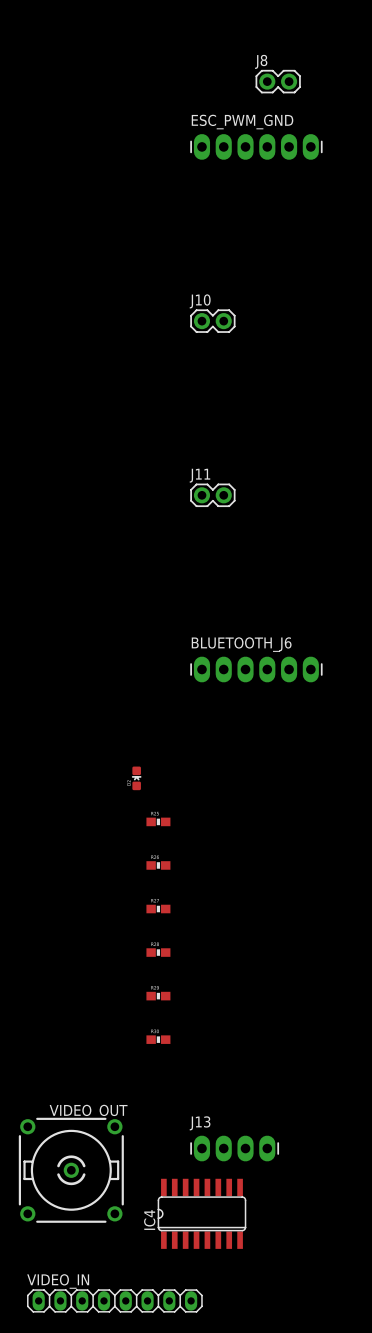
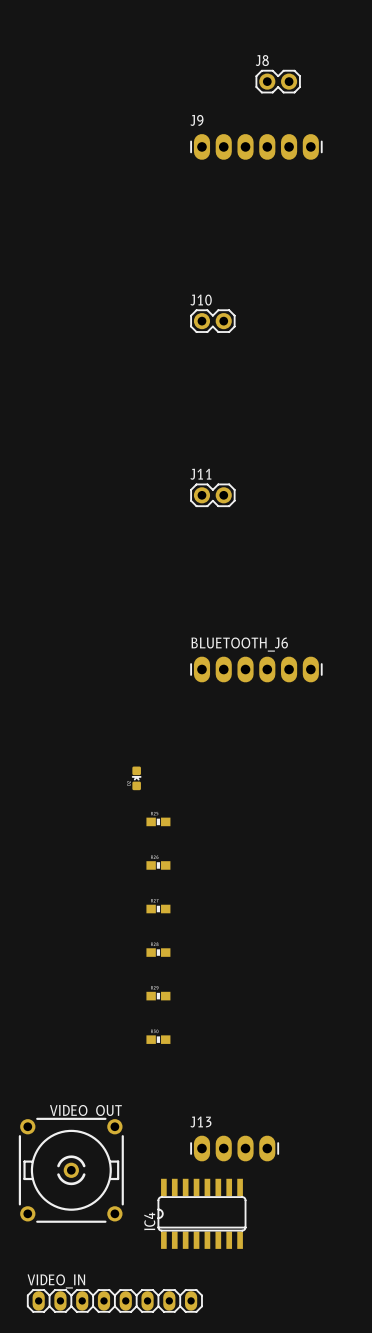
ESC_PWM_GND name: ESC_PWM_GND (242, 122) -> J9 (196, 120)

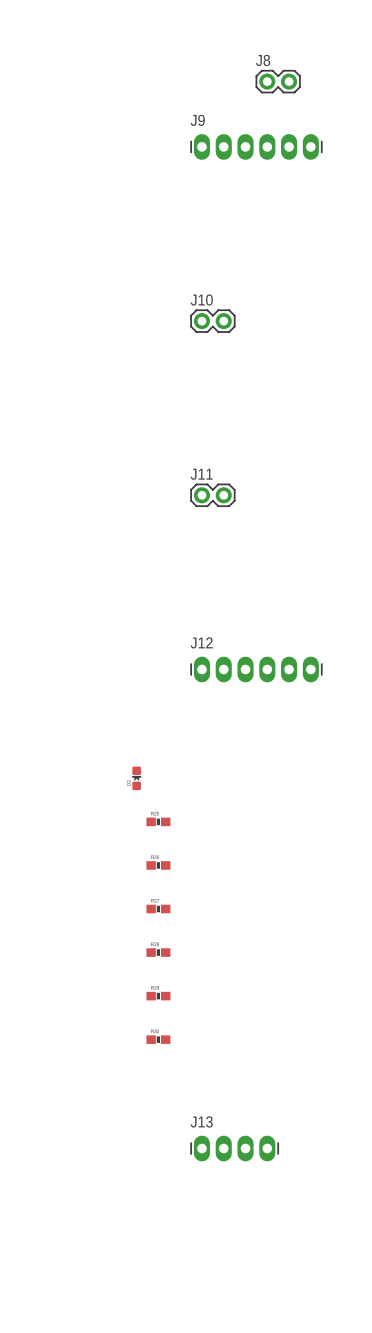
BLUETOOTH_J6 name: BLUETOOTH_J6 (239, 644) -> J12 (201, 642)
VIDEO_OUT: (71, 1170) -> none
IC4: (201, 1213) -> none
VIDEO_IN: (114, 1300) -> none

